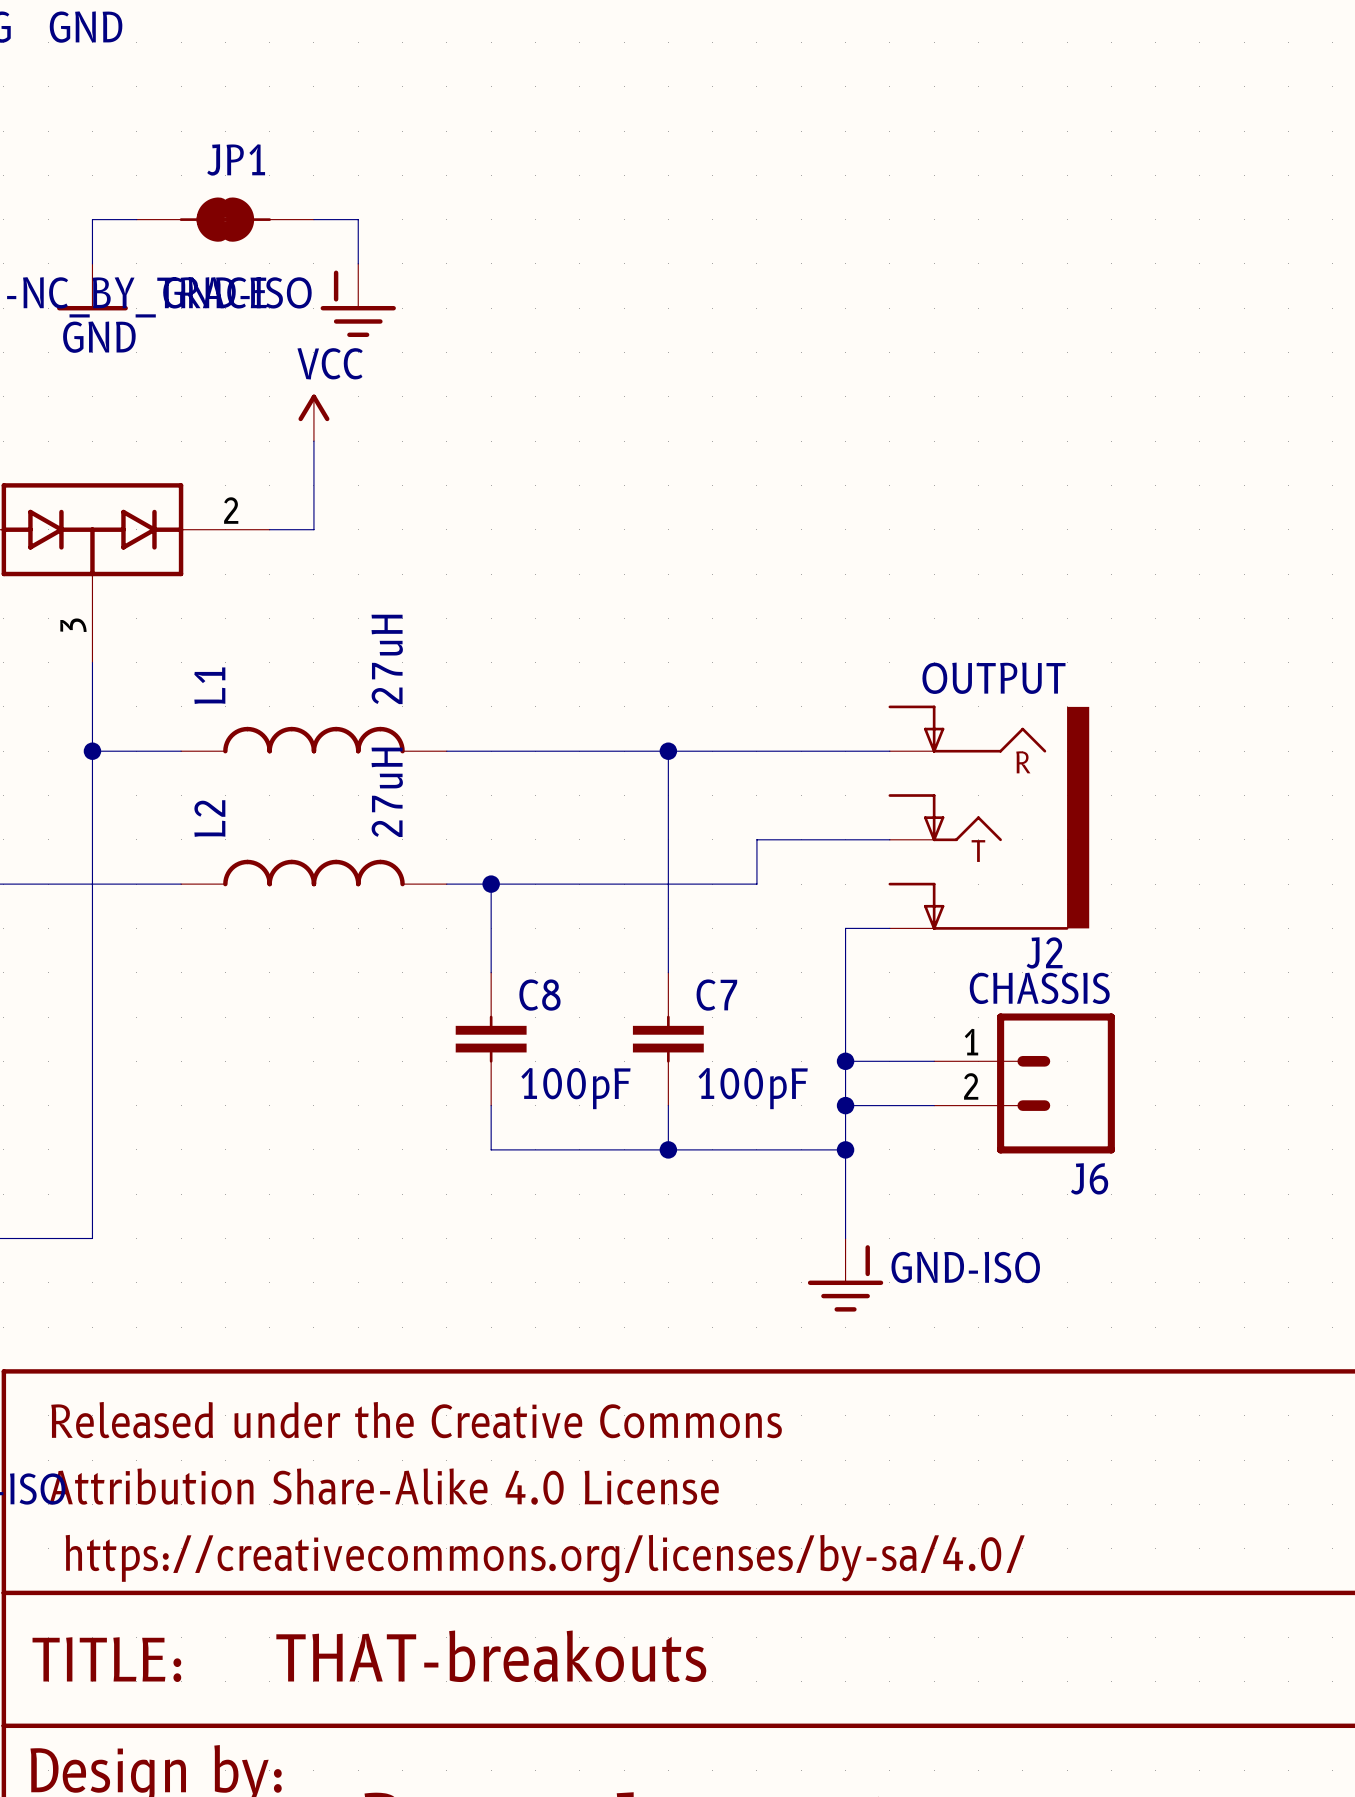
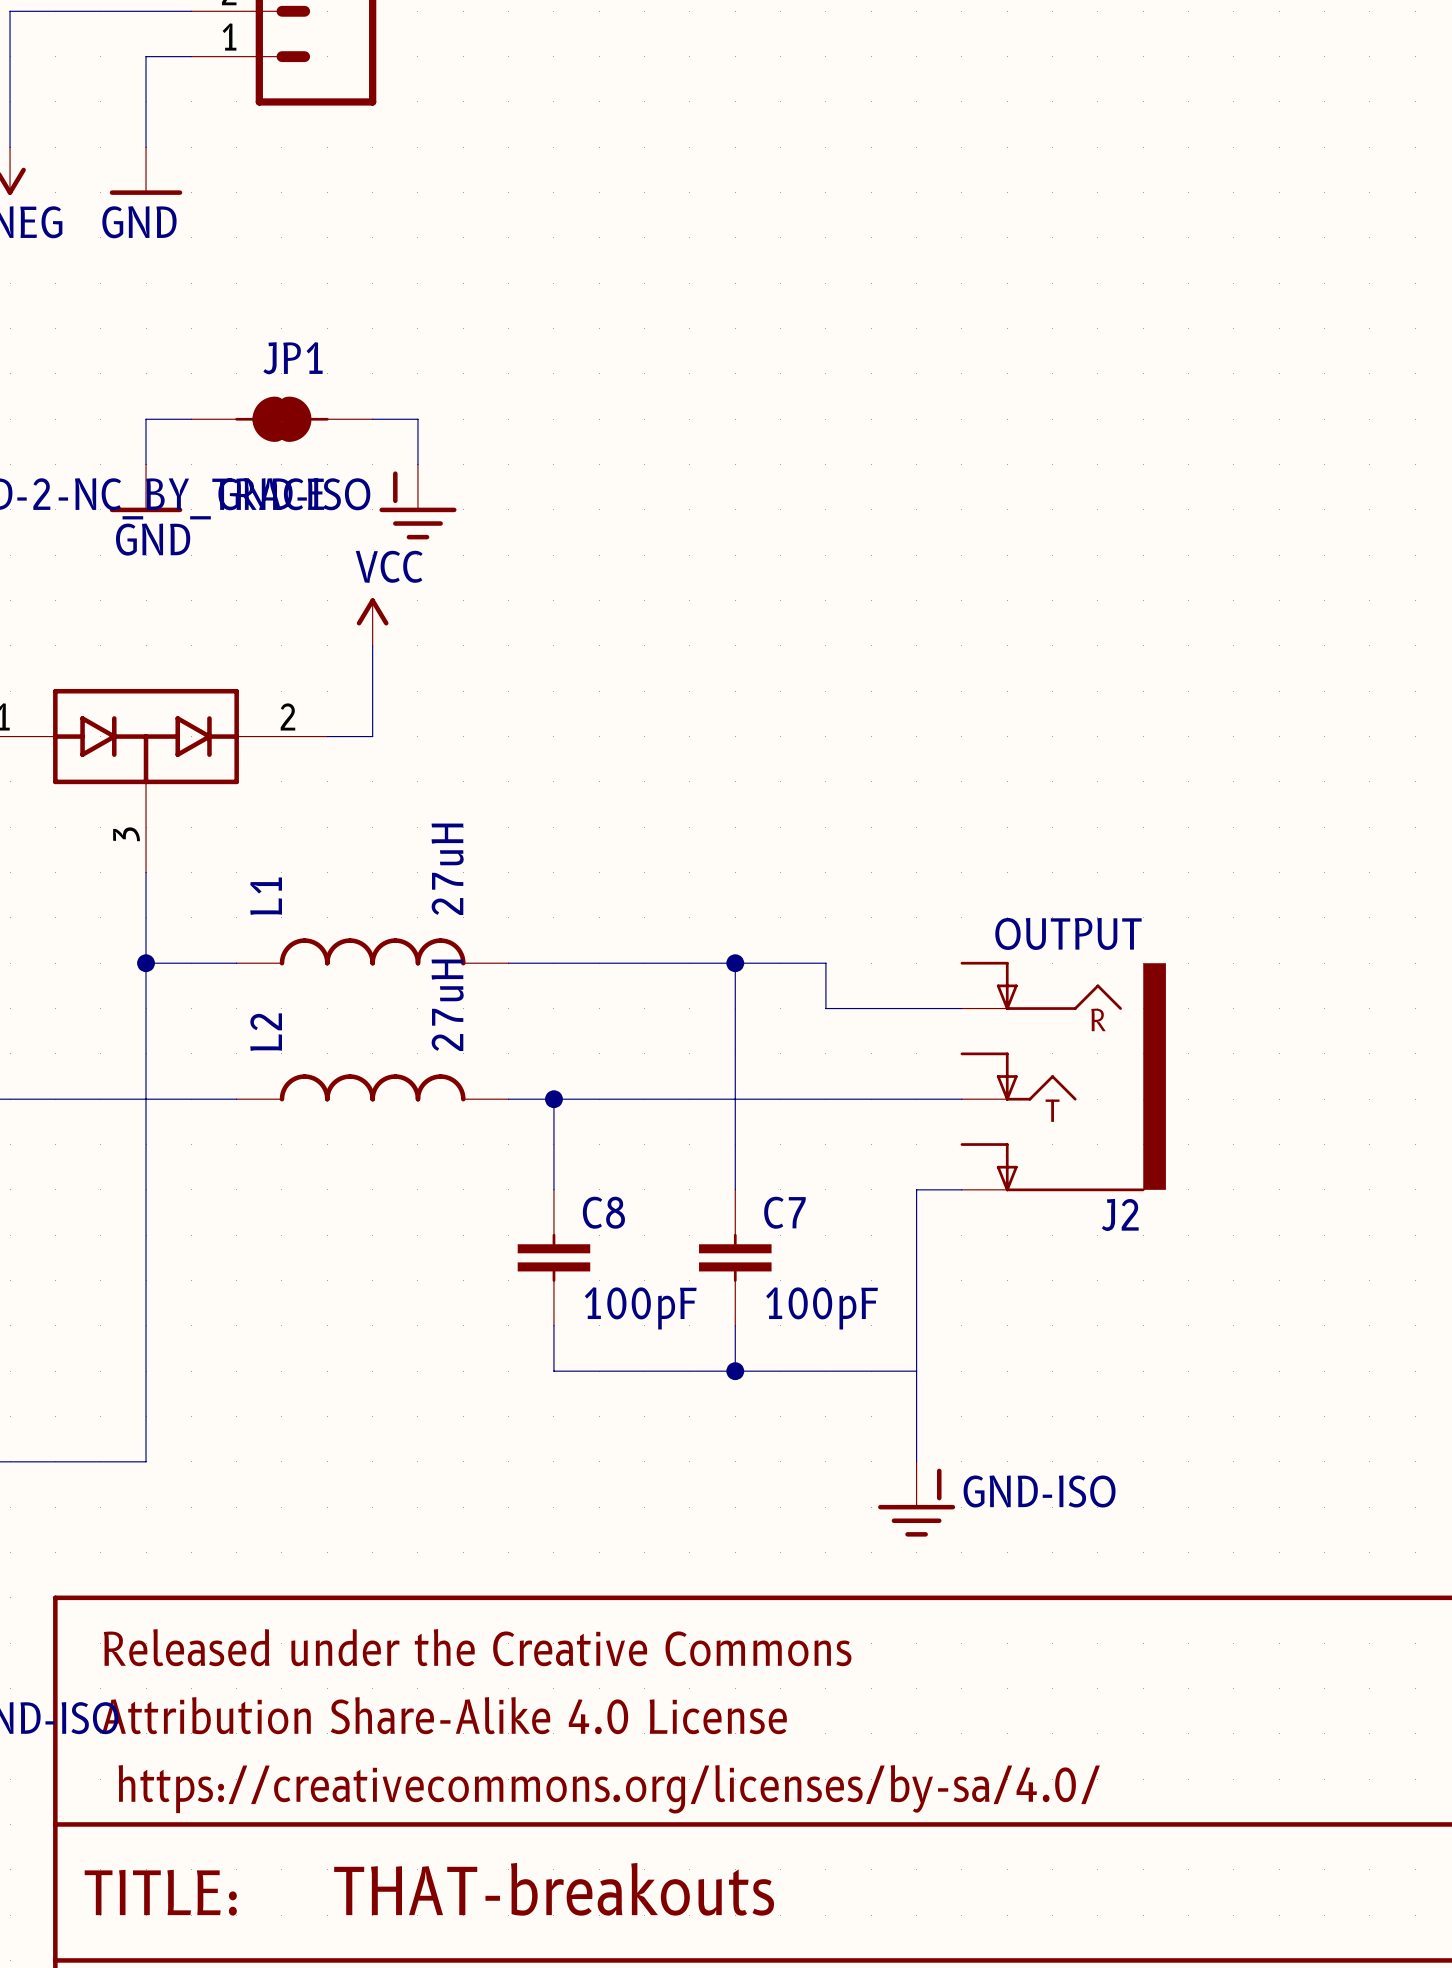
wire: (756, 751) (889, 751) -> (825, 963) (825, 1008) (961, 1008)
J2 position: (988, 817) -> (1063, 1076)
wire: (889, 839) (756, 839) (756, 884) -> (961, 1099) (825, 1099)
wire: (889, 928) (845, 928) (845, 972) -> (961, 1189) (916, 1189)
wire: (845, 1061) (934, 1061) -> none
junction: (845, 1061) -> none
J6: CHASSIS (1024, 1083) -> none
wire: (845, 1105) (934, 1105) -> none
junction: (845, 1105) -> none
junction: (845, 1149) -> none

